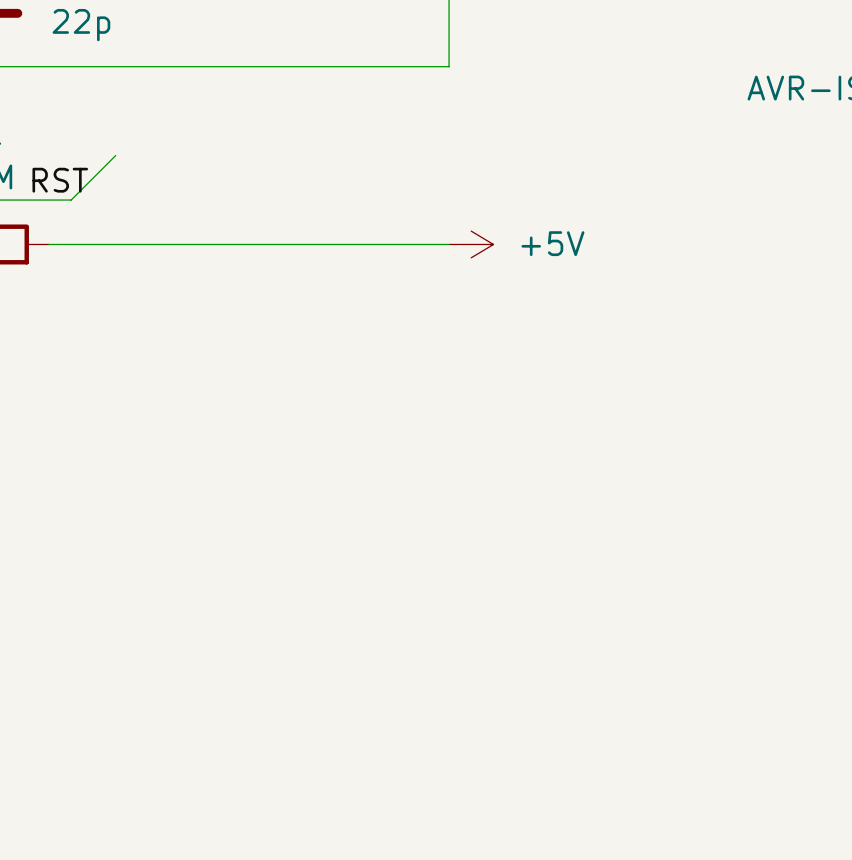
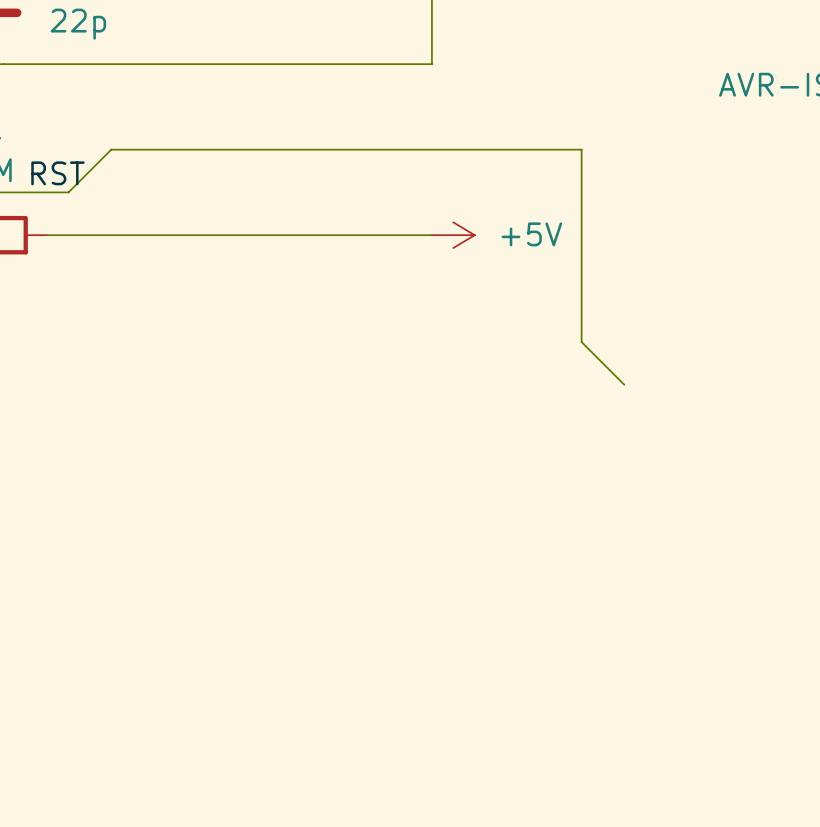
wire: none -> (111, 149) (581, 149) (581, 342) (624, 384)

